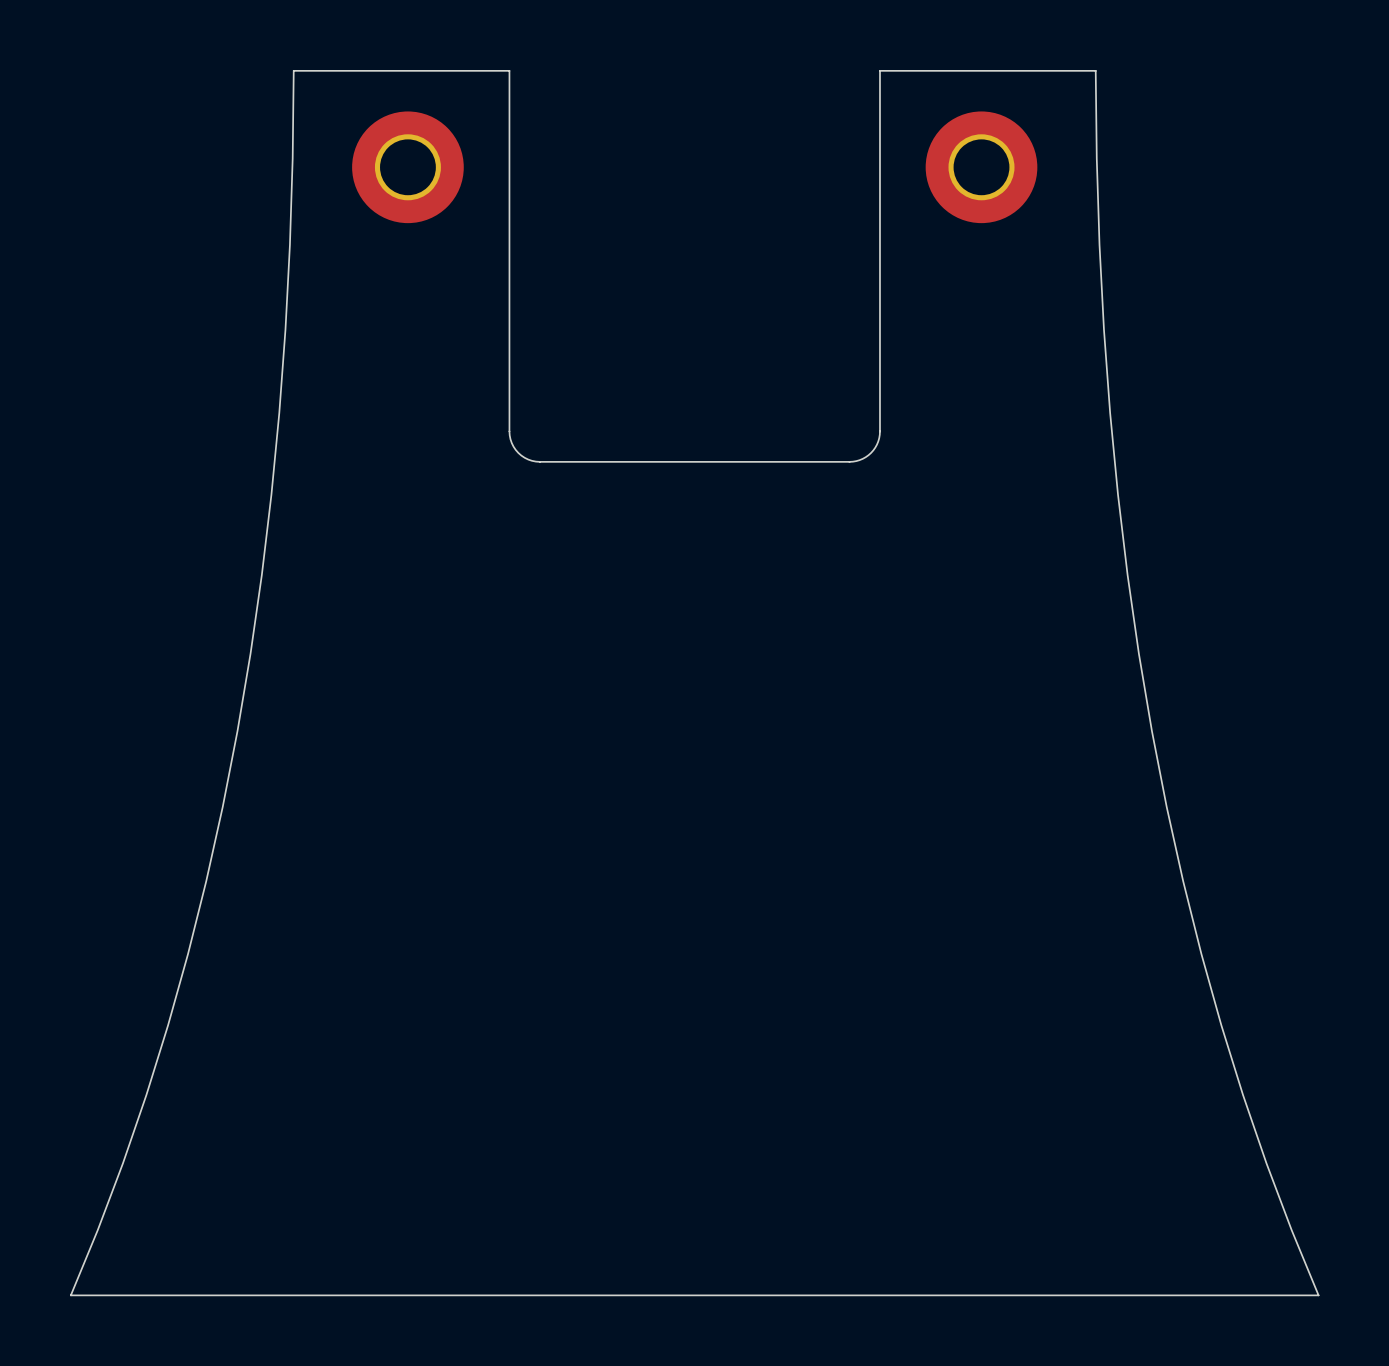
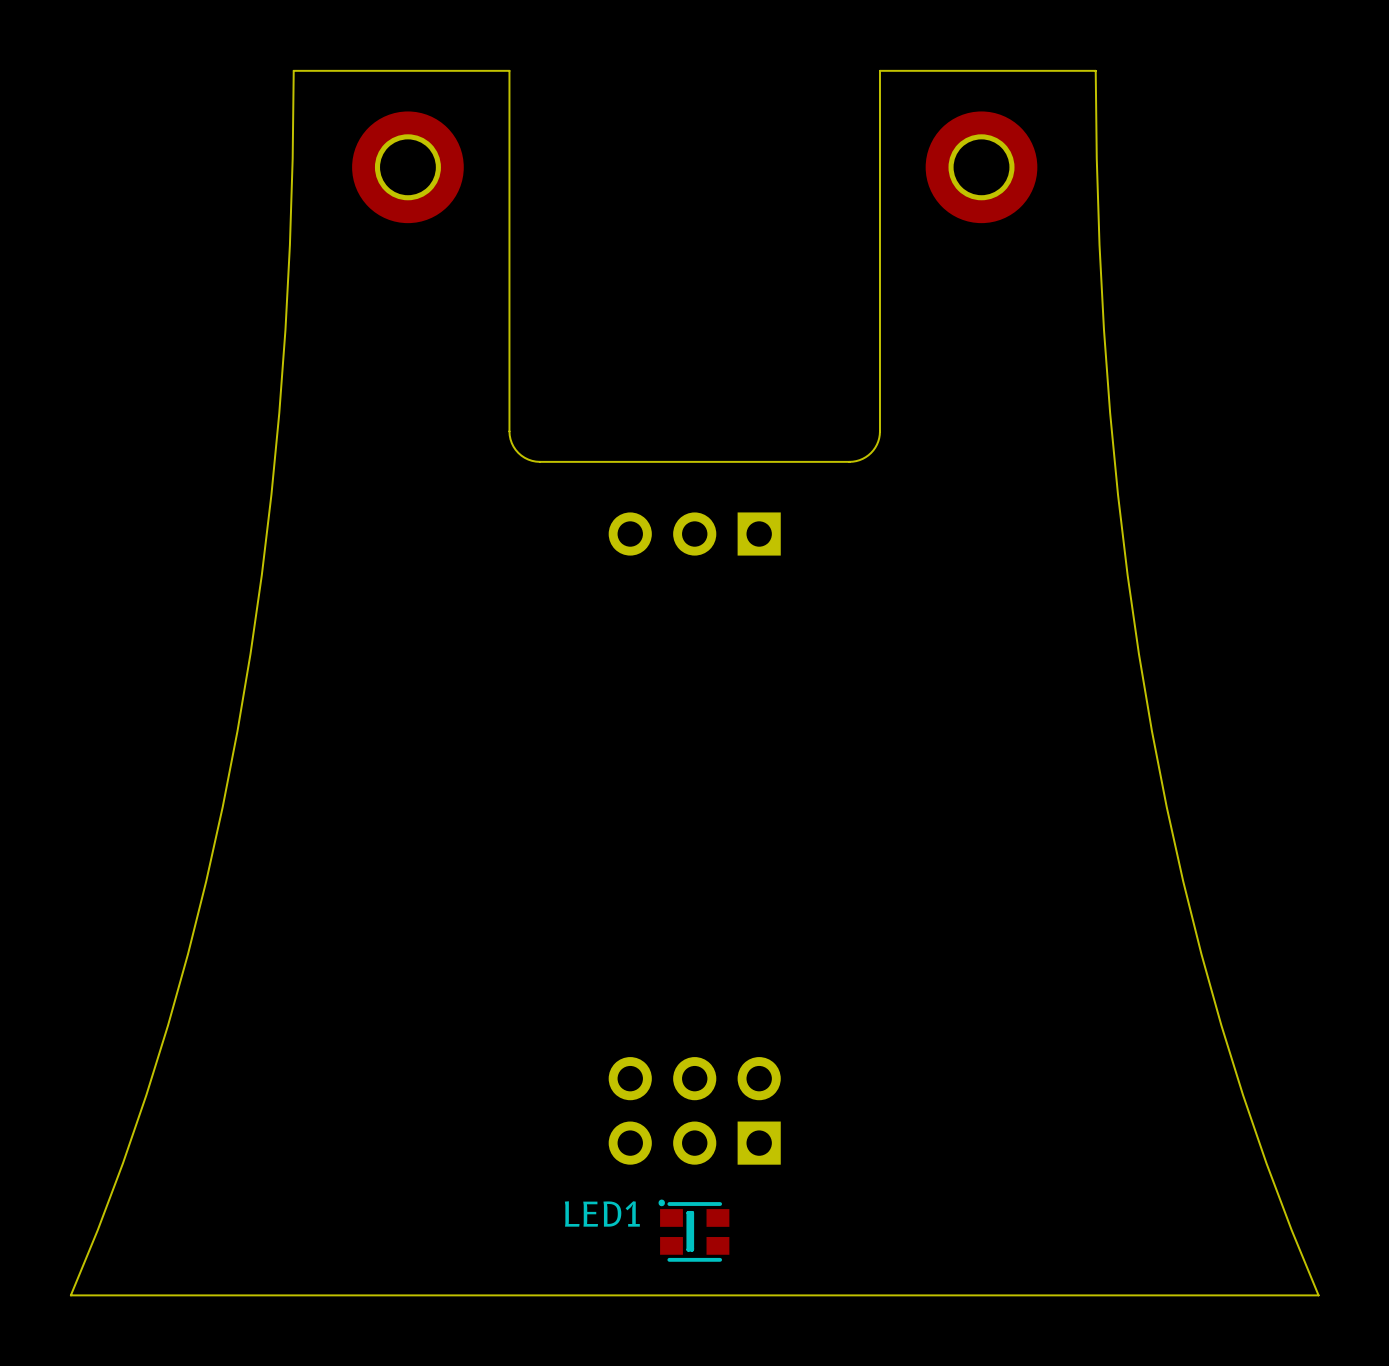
part: none -> (694, 534)
part: none -> (694, 1110)
LED1: none -> (693, 1230)

